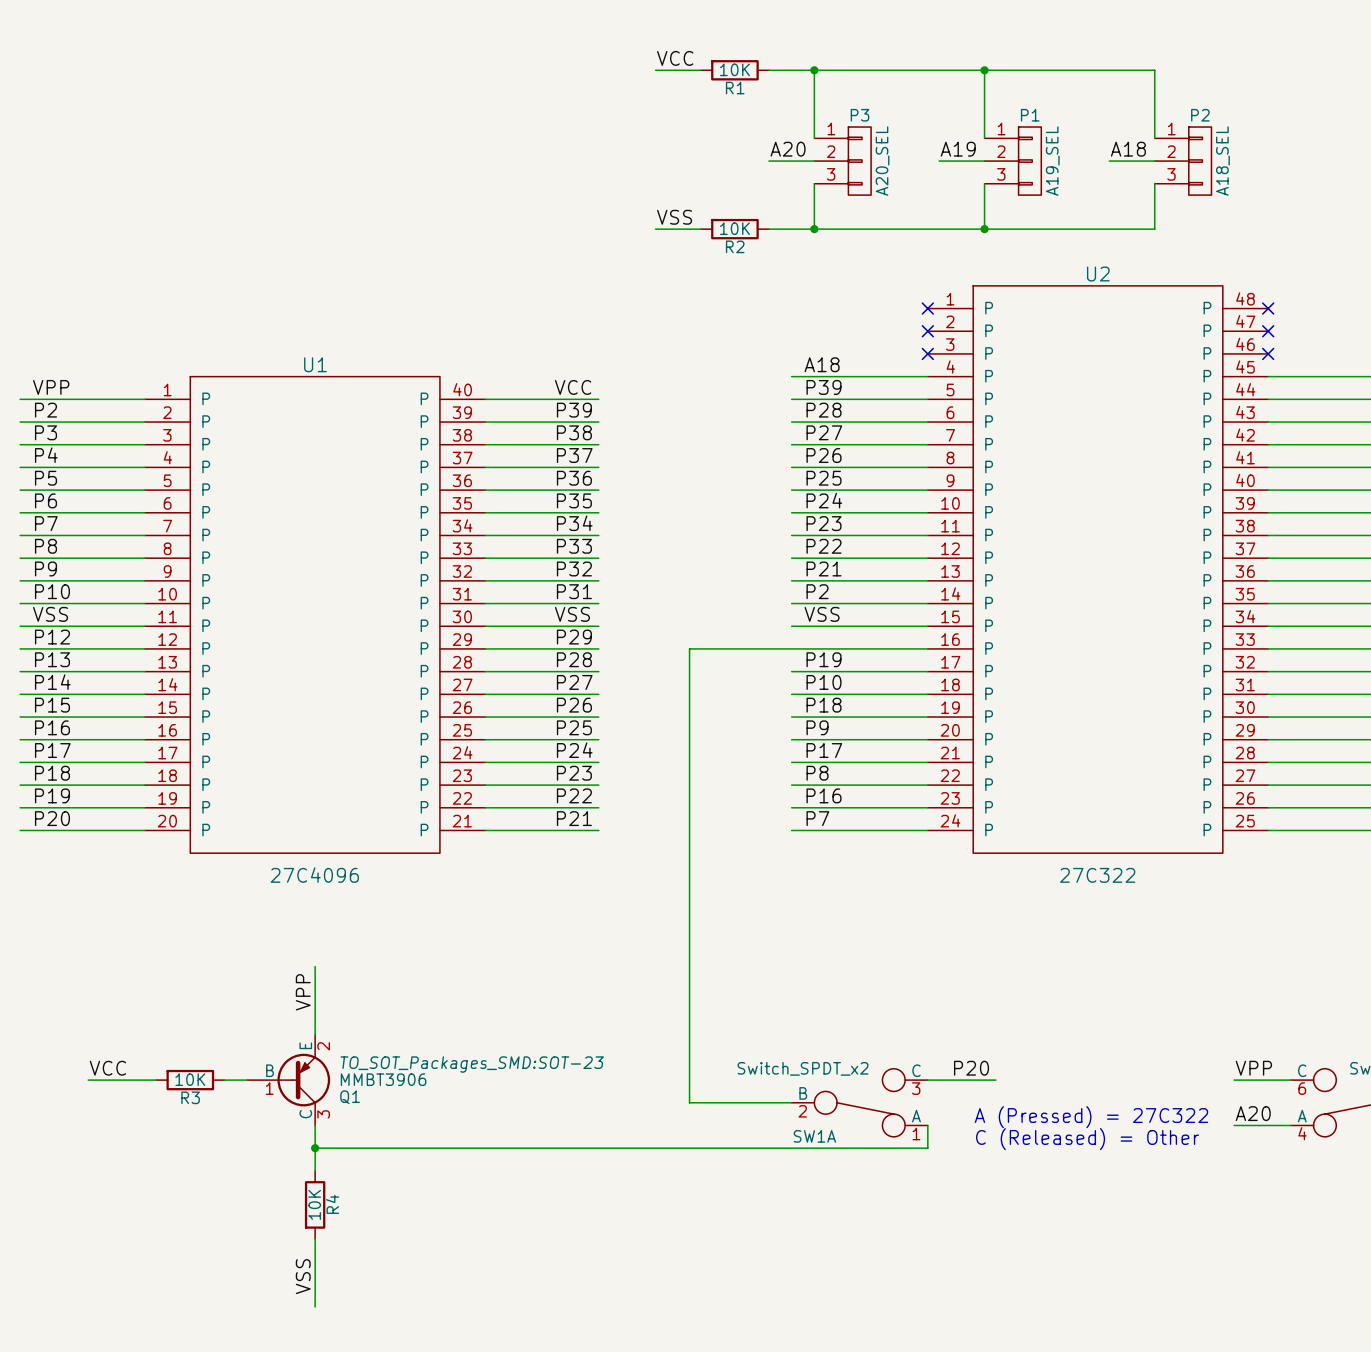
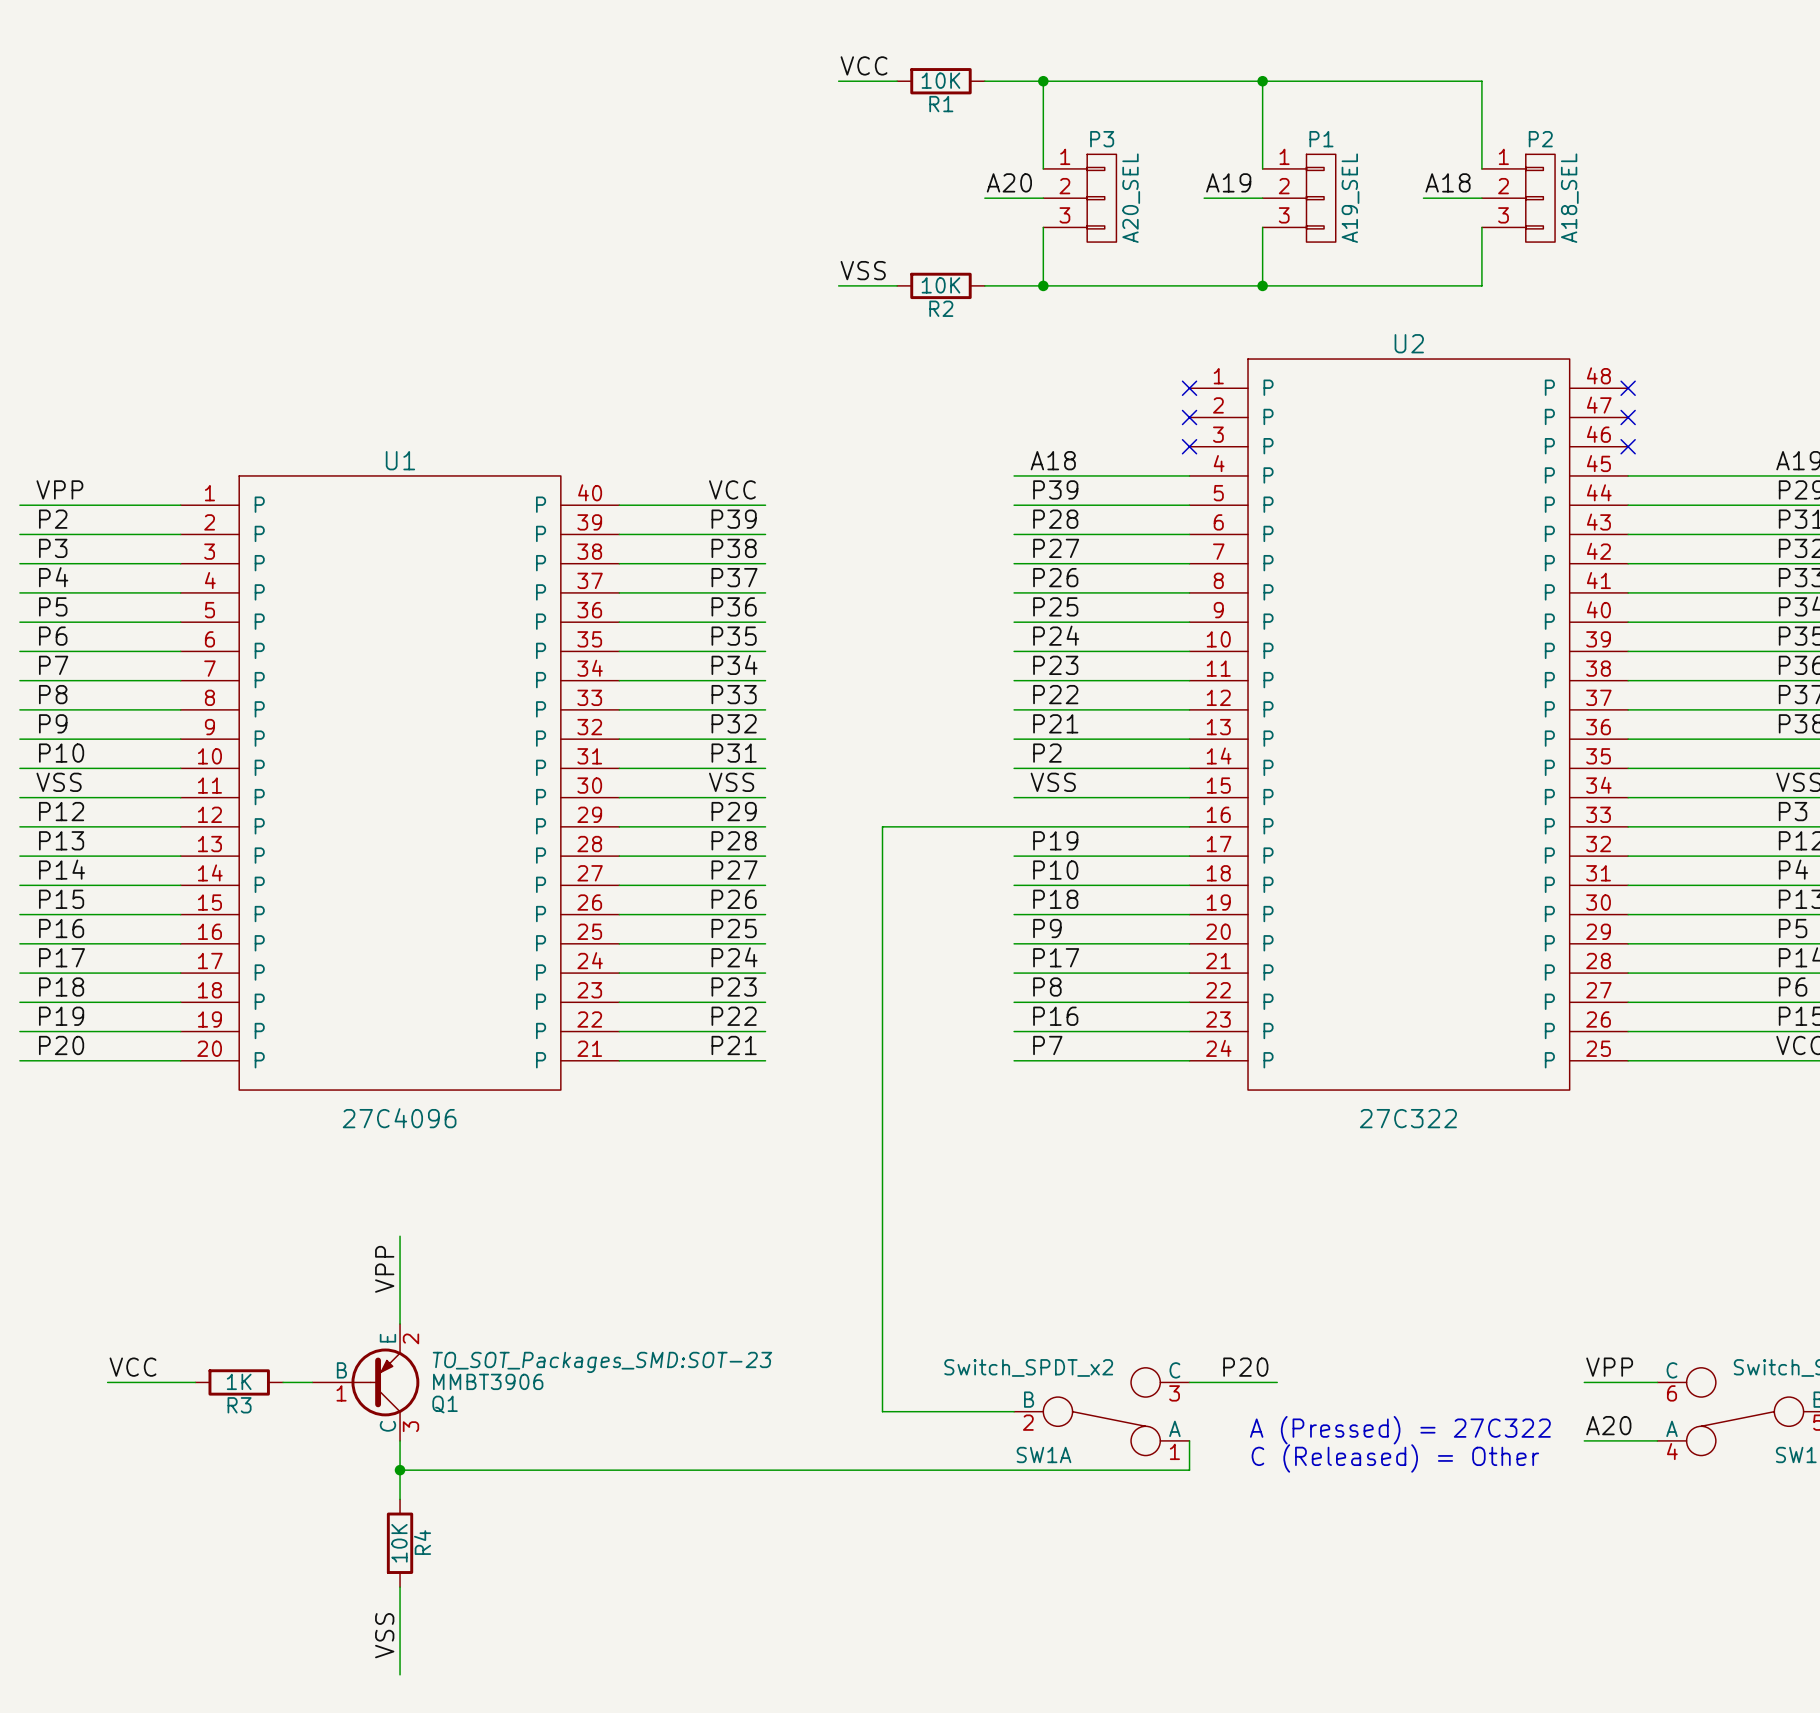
R3 value: 10K (190, 1079) -> 1K (239, 1381)

